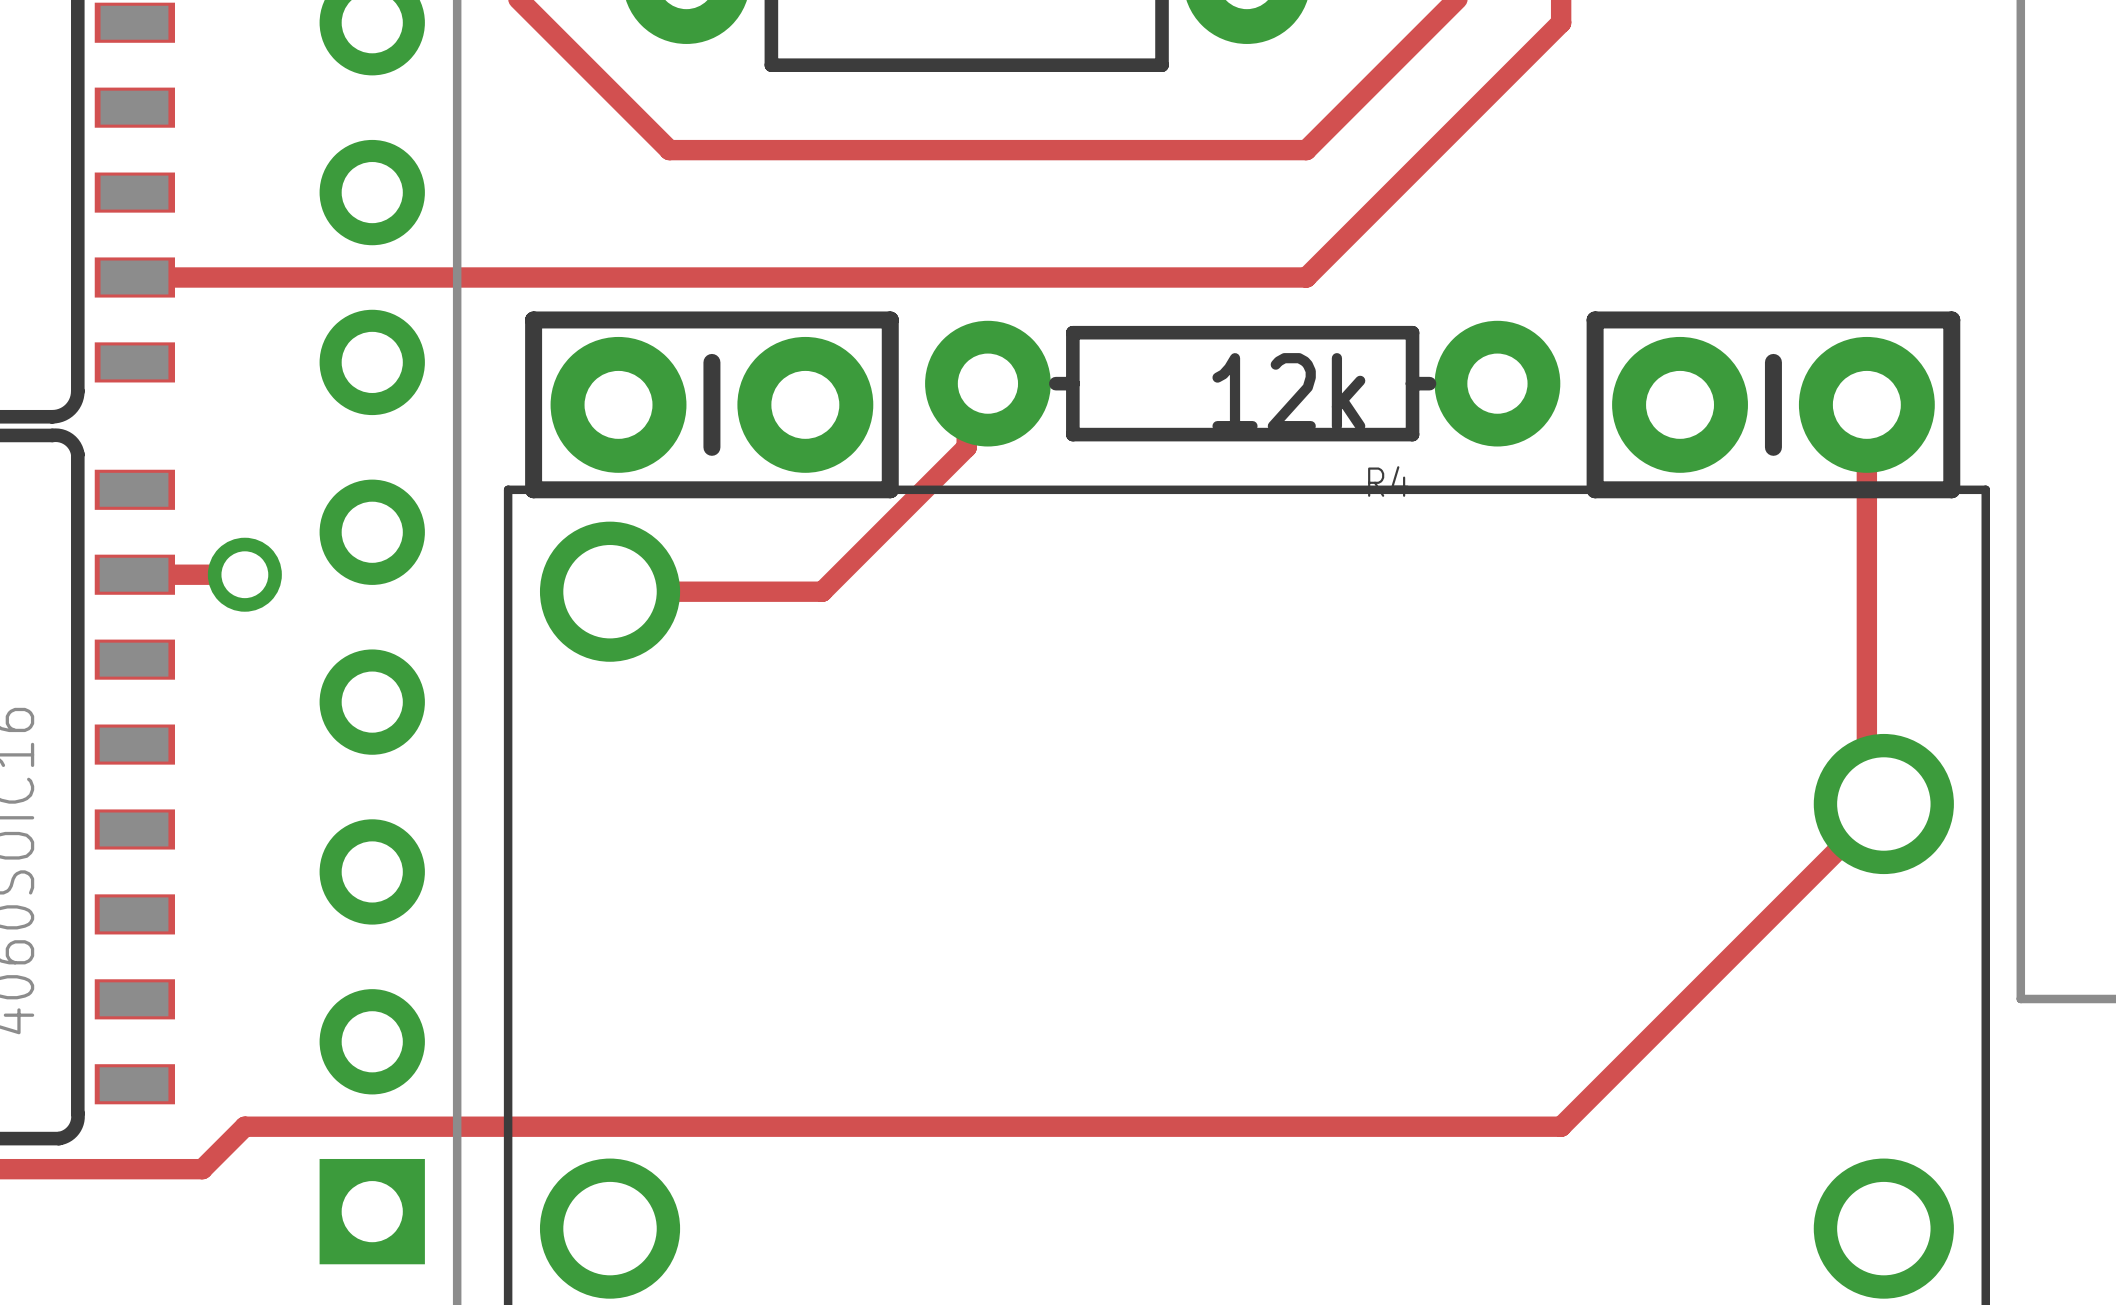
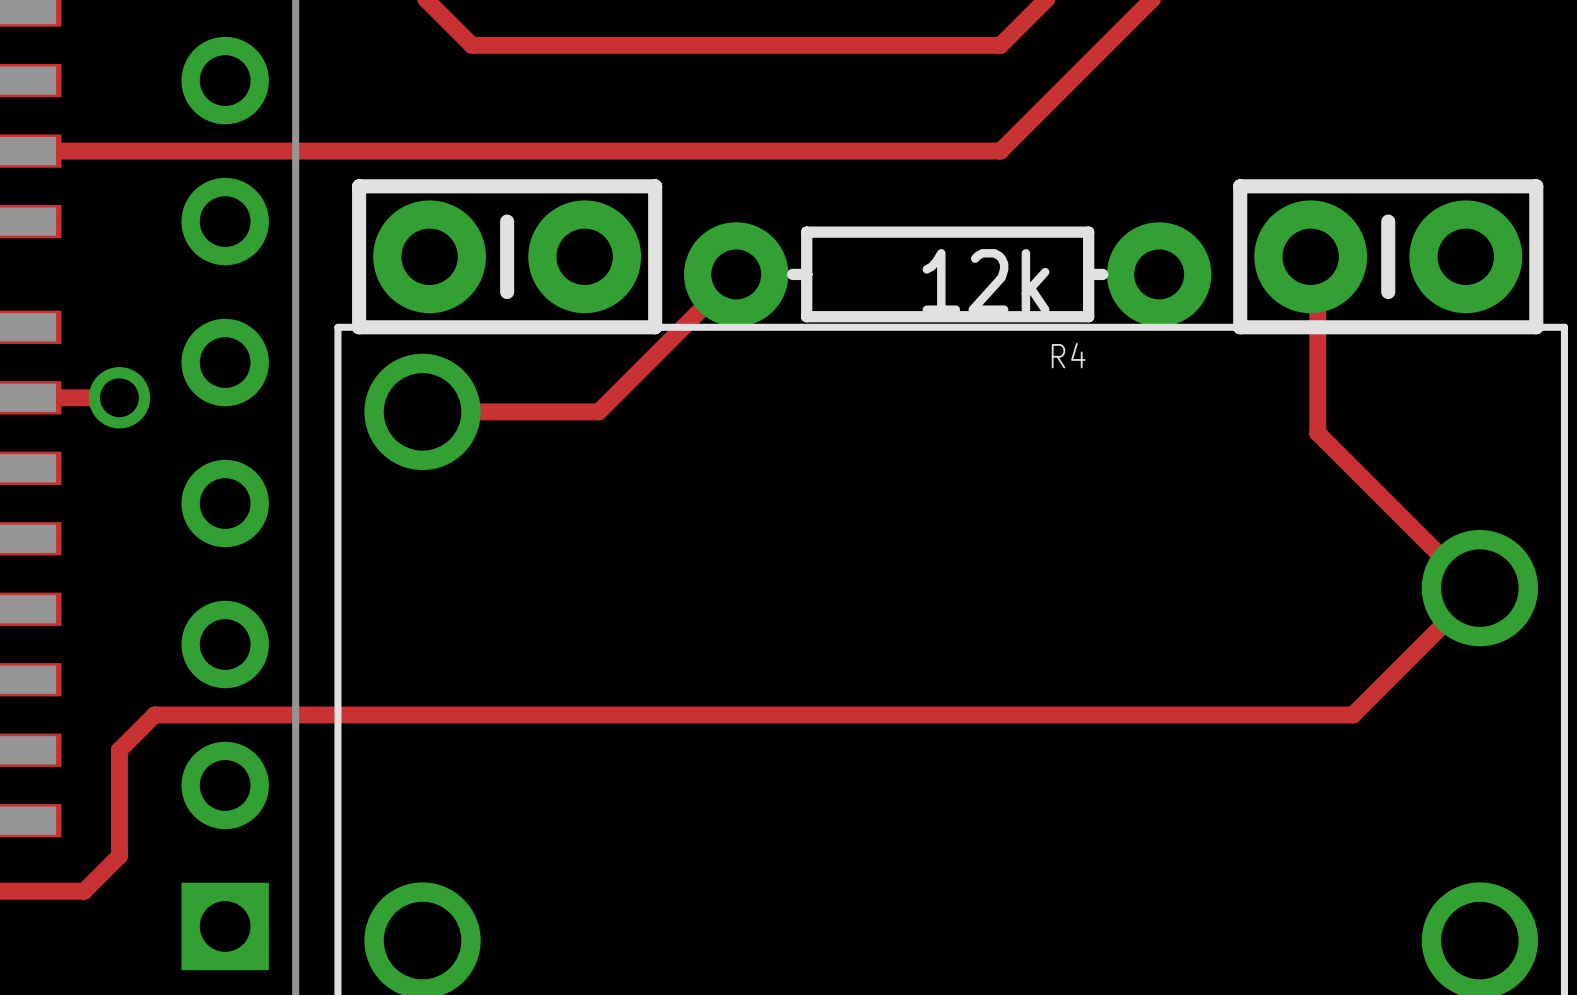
R4 position: (1242, 383) -> (947, 274)
track: (1866, 404) (1866, 787) (1883, 804) -> (1310, 256) (1317, 263) (1317, 433) (1472, 588) (1479, 588)
track: (1730, 956) (1561, 1126) (244, 1126) -> (1353, 714) (154, 714) (119, 750) (119, 855)

